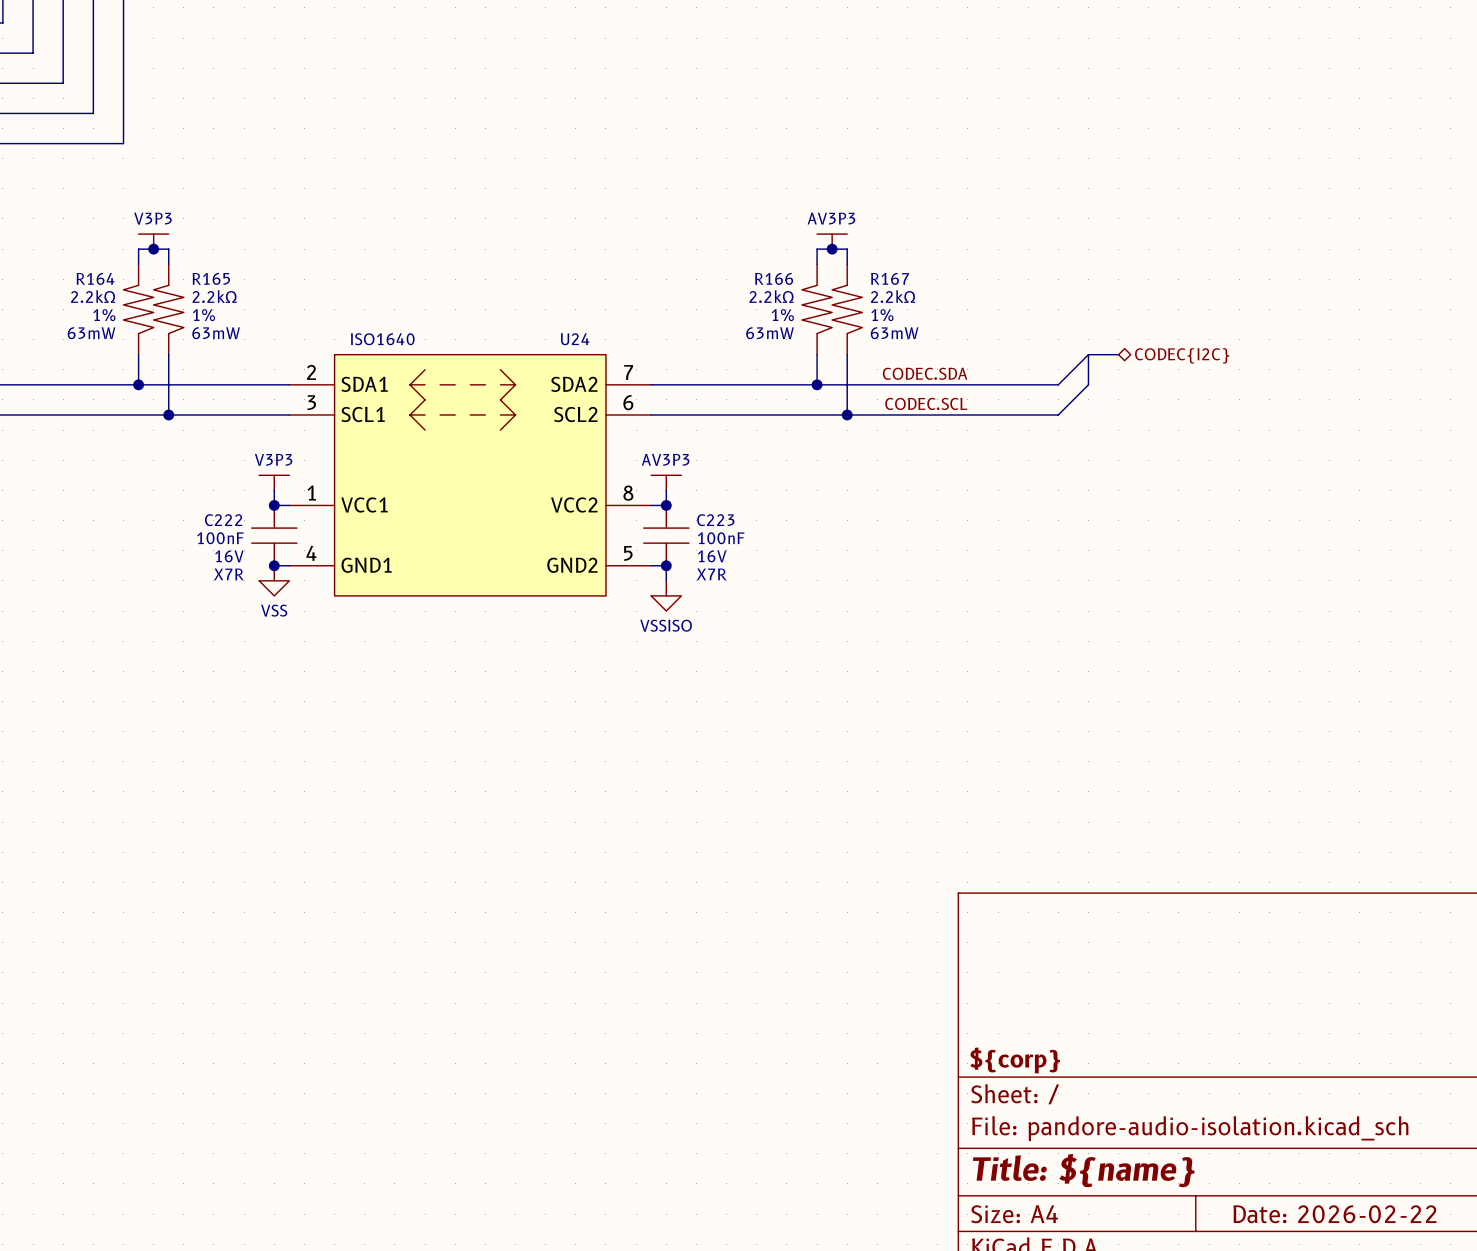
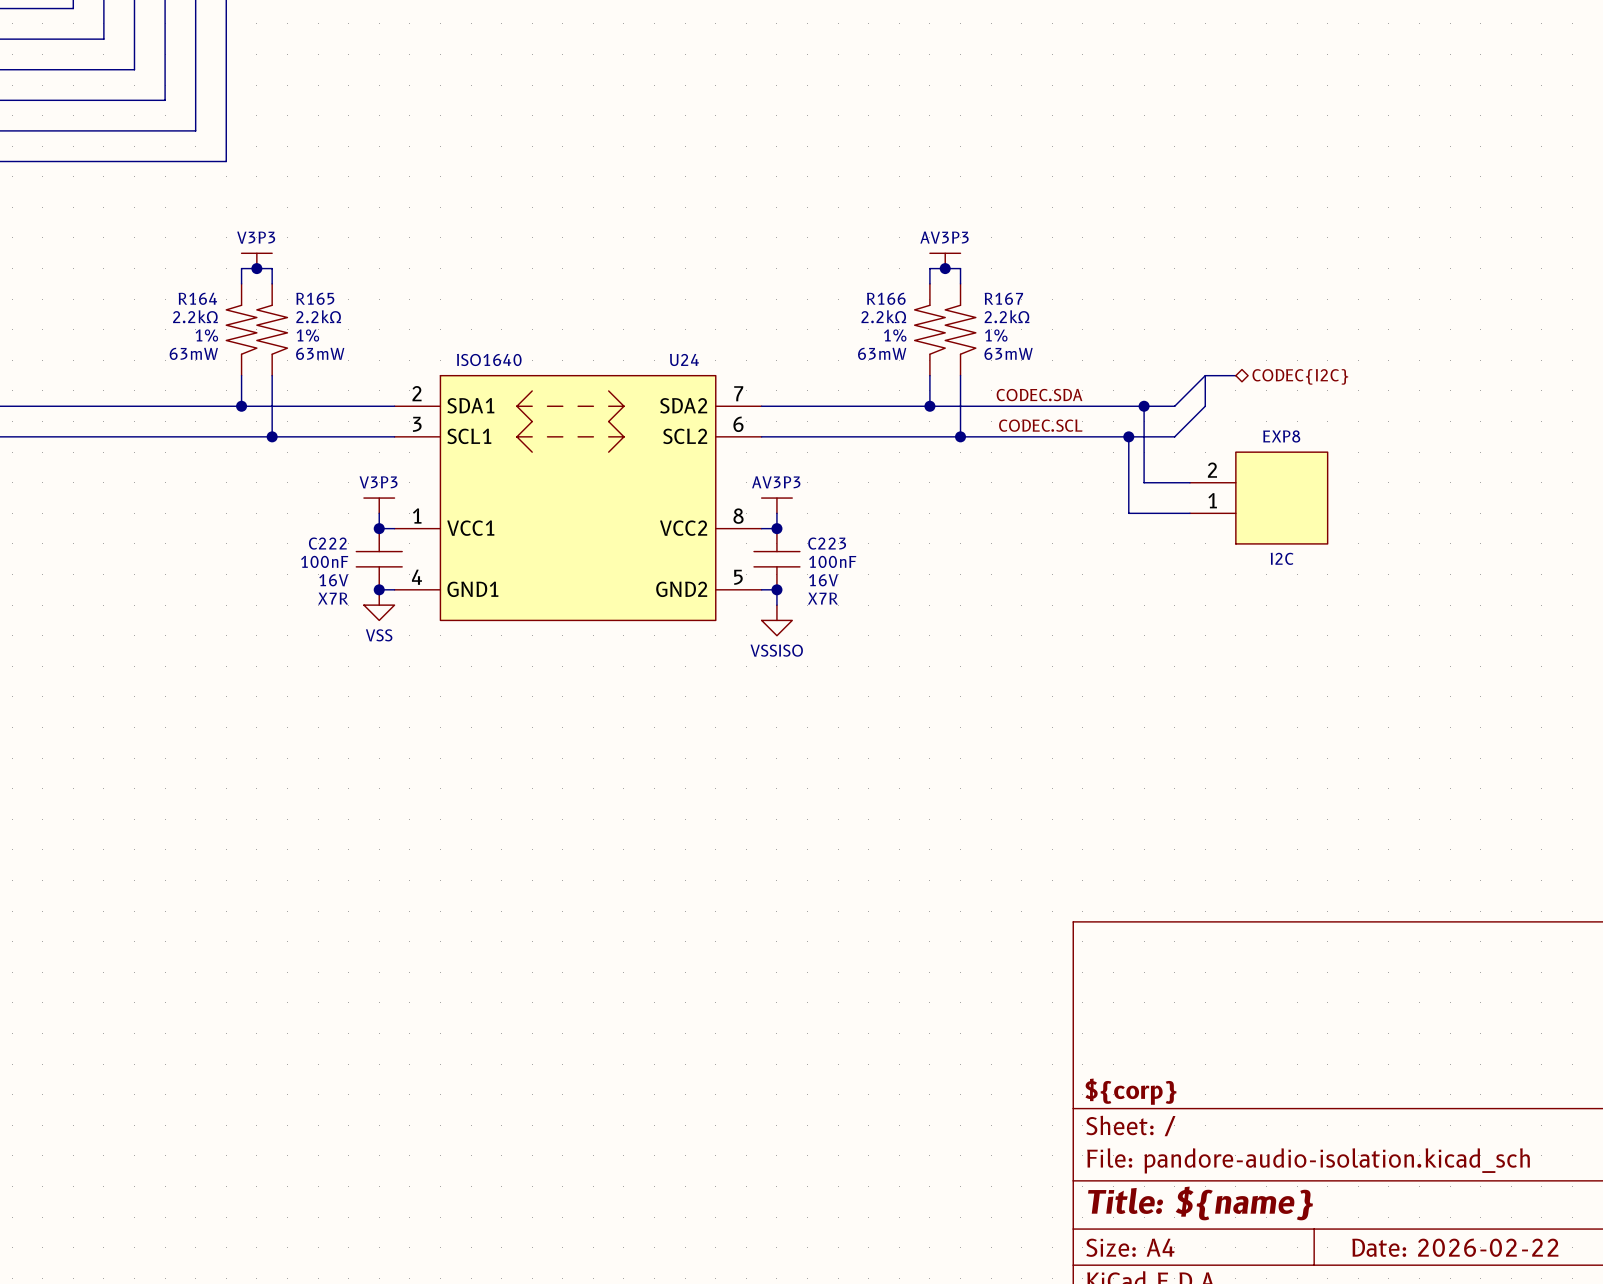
wire: none -> (1144, 406) (1144, 482) (1189, 482)
junction: none -> (1144, 406)
wire: none -> (1128, 436) (1128, 513) (1189, 513)
junction: none -> (1128, 436)
EXP8: none -> I2C (1258, 498)

